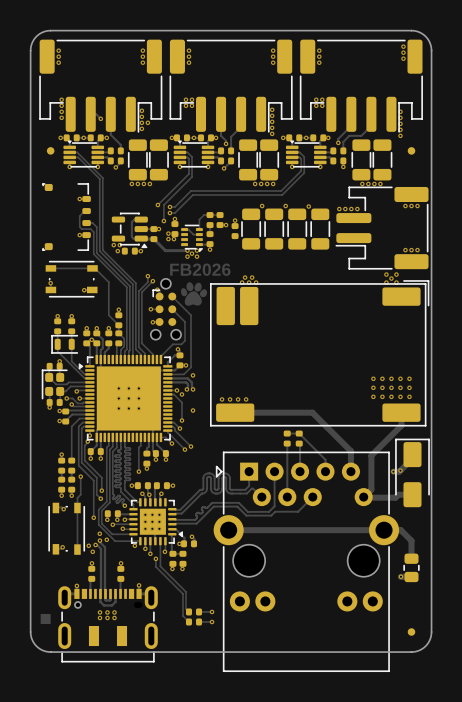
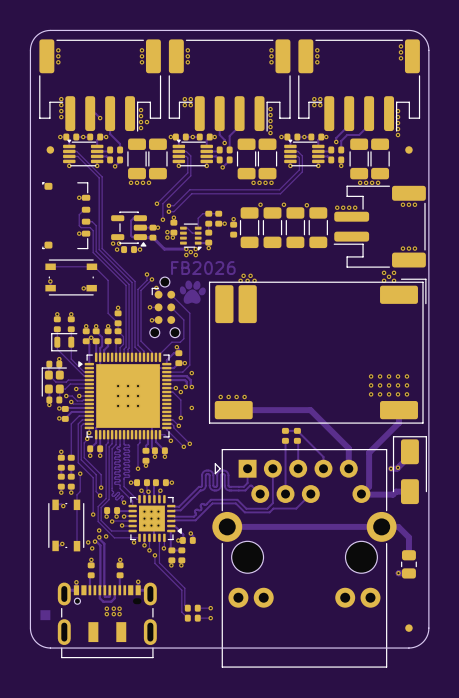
via: (99, 612) -> none
via: none -> (119, 608)
via: (99, 617) -> none
via: none -> (119, 614)

